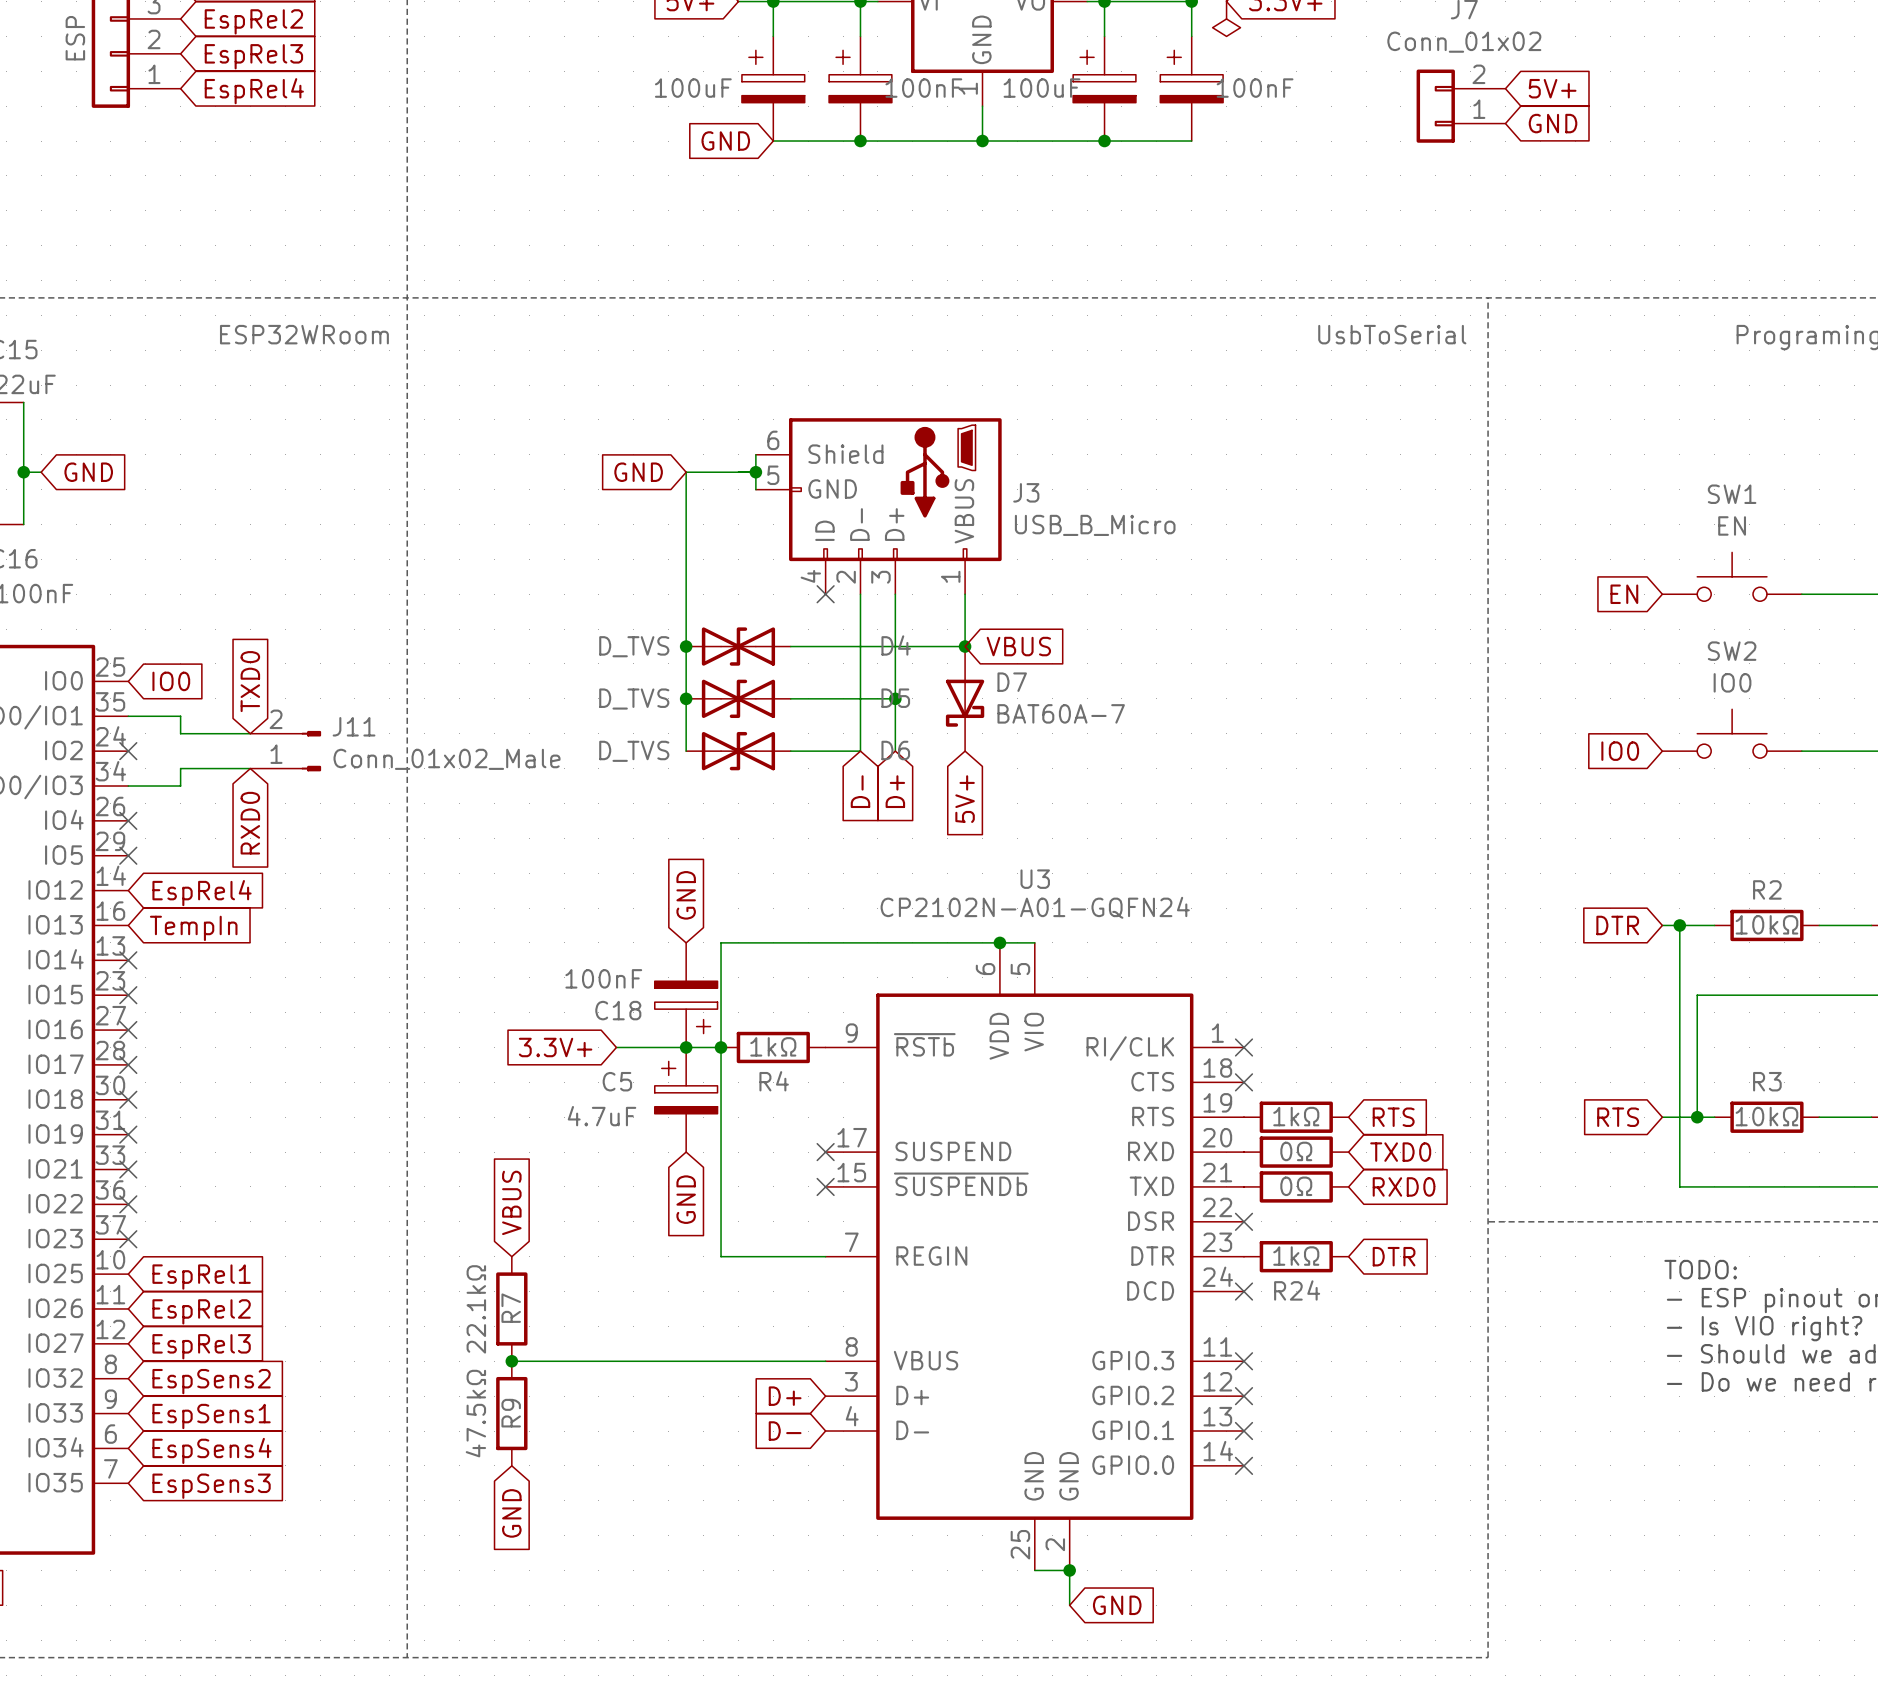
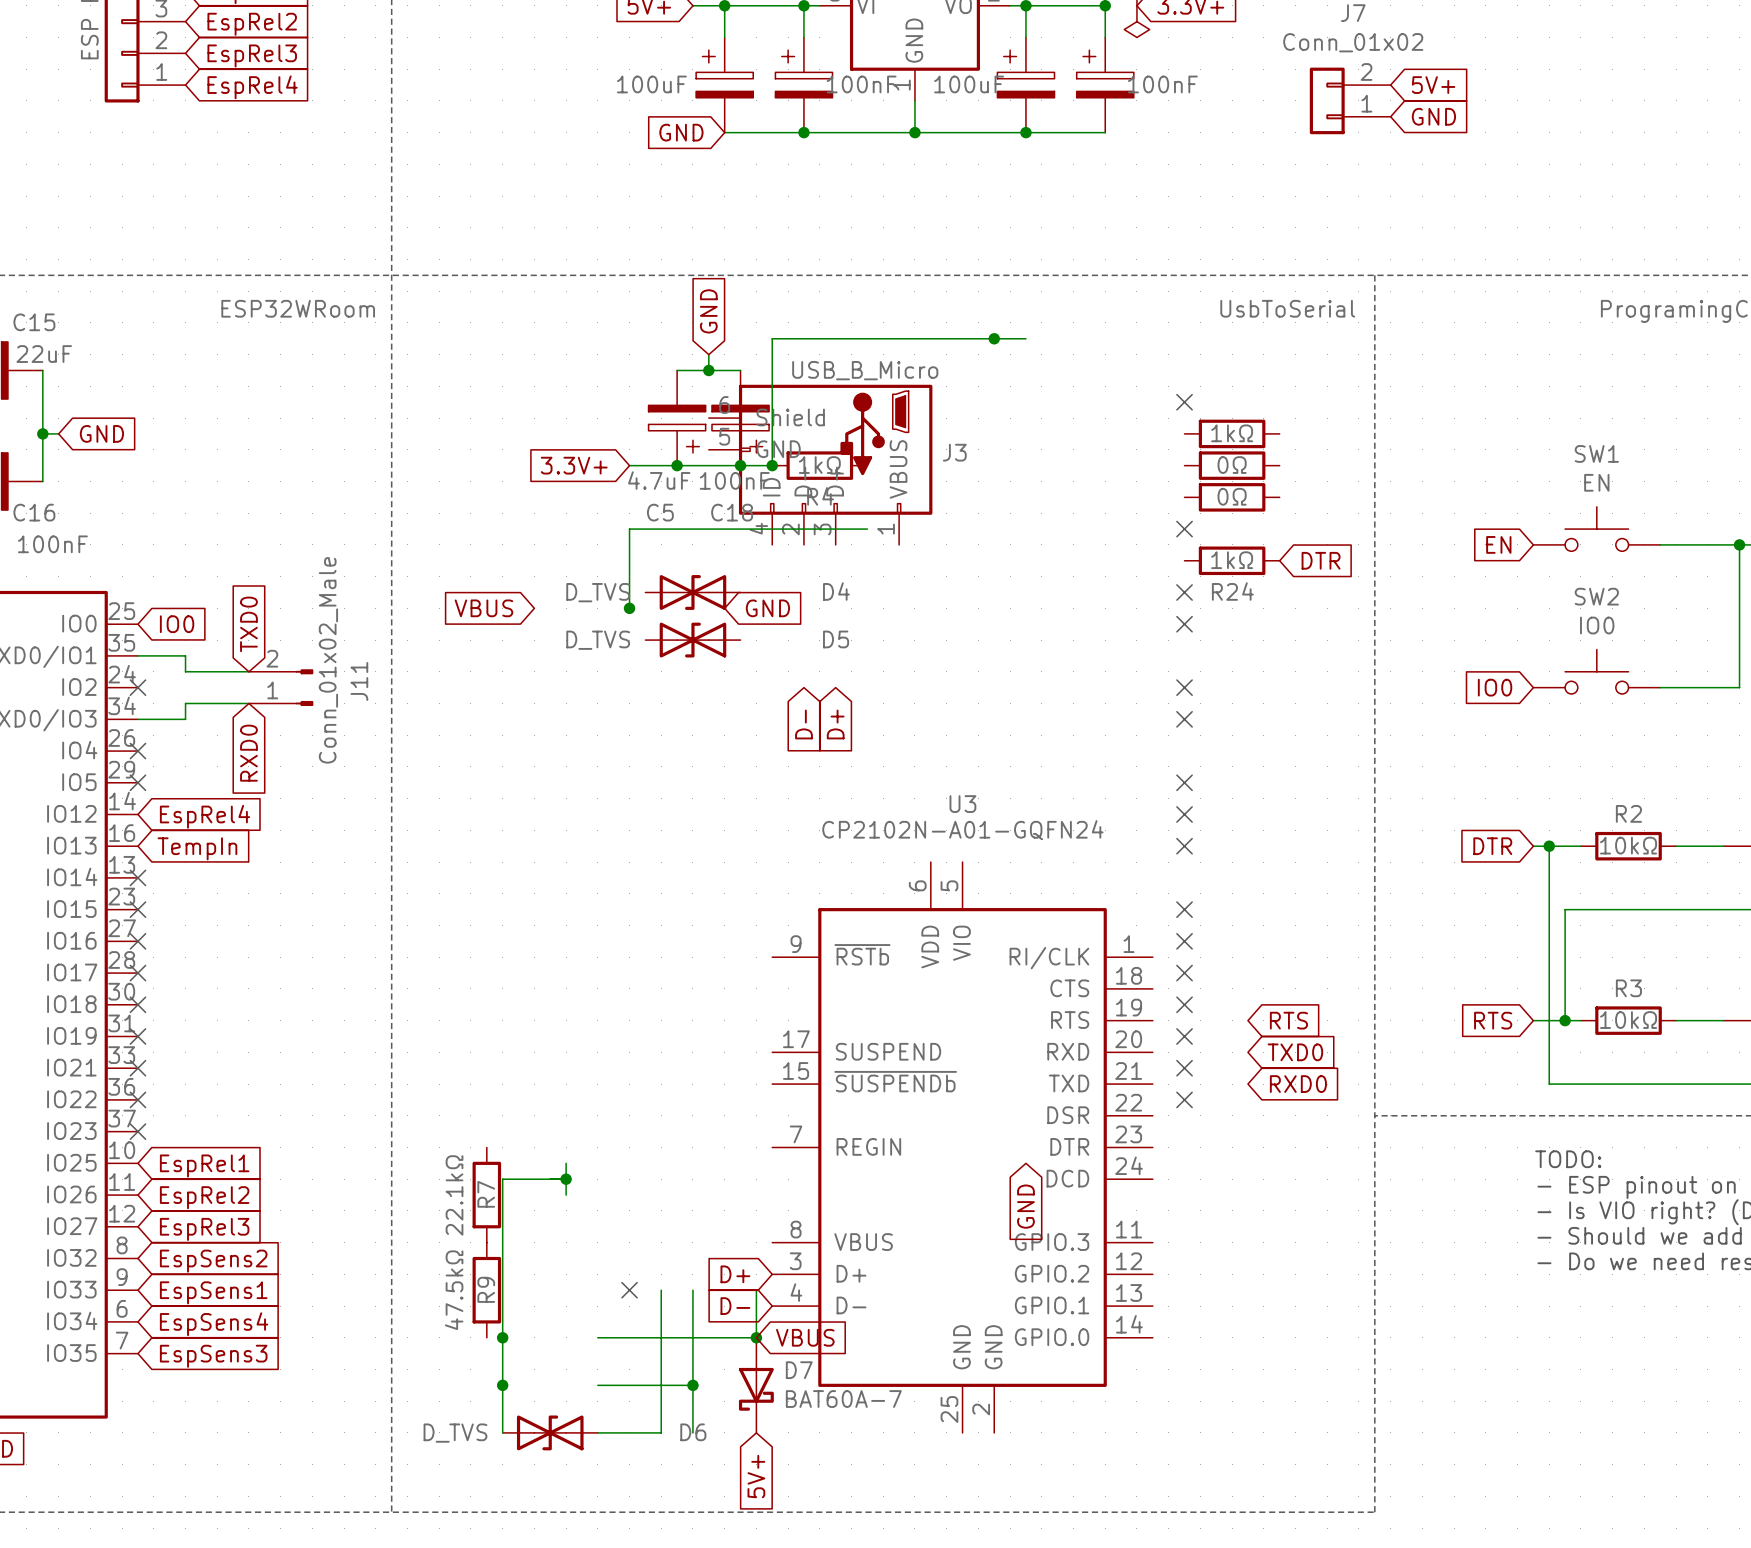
global label: none -> GND (708, 311)
junction: none -> (994, 338)
wire: none -> (1025, 338) (772, 338) (772, 465) (629, 465)
wire: none -> (708, 354) (708, 370)
wire: none -> (677, 370) (740, 370)
junction: none -> (708, 370)
no-connect mark: none -> (1184, 402)
wire: (755, 454) (755, 489) -> none
global label: GND (638, 472) -> none
wire: (755, 472) (686, 472) (686, 751) -> none
junction: (755, 472) -> none
part: none -> 1kΩ (1232, 433)
global label: none -> 3.3V+ (574, 465)
junction: none -> (677, 465)
junction: none -> (740, 465)
junction: none -> (772, 465)
part: none -> 0Ω (1232, 465)
J3 value position: USB_B_Micro (1095, 525) -> USB_B_Micro (865, 370)
part: none -> 0Ω (1232, 497)
wire: none -> (867, 529) (629, 529) (629, 608)
no-connect mark: none -> (1184, 529)
no-connect mark: (825, 594) -> none
wire: (860, 594) (860, 751) (790, 751) -> none
wire: (895, 594) (895, 751) -> none
wire: (965, 594) (965, 646) (790, 646) -> none
global label: none -> DTR (1321, 560)
junction: (686, 646) -> none
junction: (965, 646) -> none
global label: VBUS (1018, 646) -> none
no-connect mark: none -> (1184, 592)
global label: none -> VBUS (483, 608)
junction: none -> (629, 608)
global label: none -> GND (767, 608)
no-connect mark: none -> (1184, 624)
junction: (686, 698) -> none
wire: (790, 698) (895, 698) -> none
junction: (895, 698) -> none
D7 position: (965, 698) -> (756, 1385)
J11 name rotation: 0° (354, 726) -> 90° counterclockwise (359, 681)
D6 position: (738, 751) -> (550, 1432)
no-connect mark: none -> (1184, 687)
J11 value rotation: 0° (447, 759) -> 90° counterclockwise (328, 660)
no-connect mark: none -> (1184, 719)
global label: 5V+ (965, 799) -> none
no-connect mark: none -> (1184, 782)
no-connect mark: none -> (1184, 814)
global label: GND (686, 895) -> none
no-connect mark: none -> (1184, 846)
junction: (999, 942) -> none
wire: (1034, 942) (721, 942) (721, 1256) (825, 1256) -> none
C18 value position: 100nF (603, 978) -> 100nF (734, 480)
C18 position: (686, 995) -> (740, 418)
no-connect mark: none -> (1184, 909)
C18 name position: C18 (618, 1010) -> C18 (732, 512)
no-connect mark: none -> (1184, 941)
global label: 3.3V+ (555, 1047) -> none
wire: (616, 1047) (721, 1047) -> none
junction: (686, 1047) -> none
junction: (721, 1047) -> none
R4 position: (773, 1047) -> (819, 465)
no-connect mark: (1243, 1047) -> none
no-connect mark: none -> (1184, 973)
C5 name position: C5 (617, 1081) -> C5 (660, 512)
no-connect mark: (1243, 1082) -> none
C5 rotation: 0° (686, 1087) -> 180° (677, 429)
C5 position: (686, 1099) -> (677, 418)
no-connect mark: none -> (1184, 1004)
C5 value position: 4.7uF (602, 1116) -> 4.7uF (659, 480)
part: 1kΩ (1296, 1117) -> none
no-connect mark: none -> (1184, 1036)
no-connect mark: (825, 1152) -> none
part: 0Ω (1296, 1152) -> none
no-connect mark: none -> (1184, 1068)
no-connect mark: (825, 1186) -> none
part: 0Ω (1296, 1186) -> none
global label: GND (686, 1199) -> none
global label: VBUS (511, 1202) -> none
no-connect mark: none -> (1184, 1099)
no-connect mark: (1243, 1221) -> none
R24 position: (1296, 1256) -> (1232, 560)
global label: DTR (1394, 1256) -> none
wire: none -> (566, 1163) (566, 1195)
wire: none -> (566, 1179) (502, 1179) (502, 1432)
junction: none -> (566, 1179)
no-connect mark: (1243, 1291) -> none
global label: none -> GND (1025, 1206)
wire: (511, 1361) (825, 1361) -> none
junction: (511, 1361) -> none
no-connect mark: (1243, 1361) -> none
no-connect mark: (1243, 1396) -> none
no-connect mark: none -> (629, 1290)
wire: none -> (661, 1290) (661, 1432) (597, 1432)
wire: none -> (692, 1290) (692, 1432)
wire: none -> (756, 1290) (756, 1337) (597, 1337)
no-connect mark: (1243, 1431) -> none
junction: none -> (502, 1337)
junction: none -> (756, 1337)
global label: none -> VBUS (805, 1337)
no-connect mark: (1243, 1465) -> none
global label: GND (511, 1513) -> none
junction: none -> (502, 1385)
wire: none -> (597, 1385) (692, 1385)
junction: none -> (692, 1385)
wire: (1034, 1570) (1069, 1570) (1069, 1605) -> none
junction: (1069, 1570) -> none
global label: GND (1117, 1605) -> none
global label: none -> 5V+ (756, 1476)

